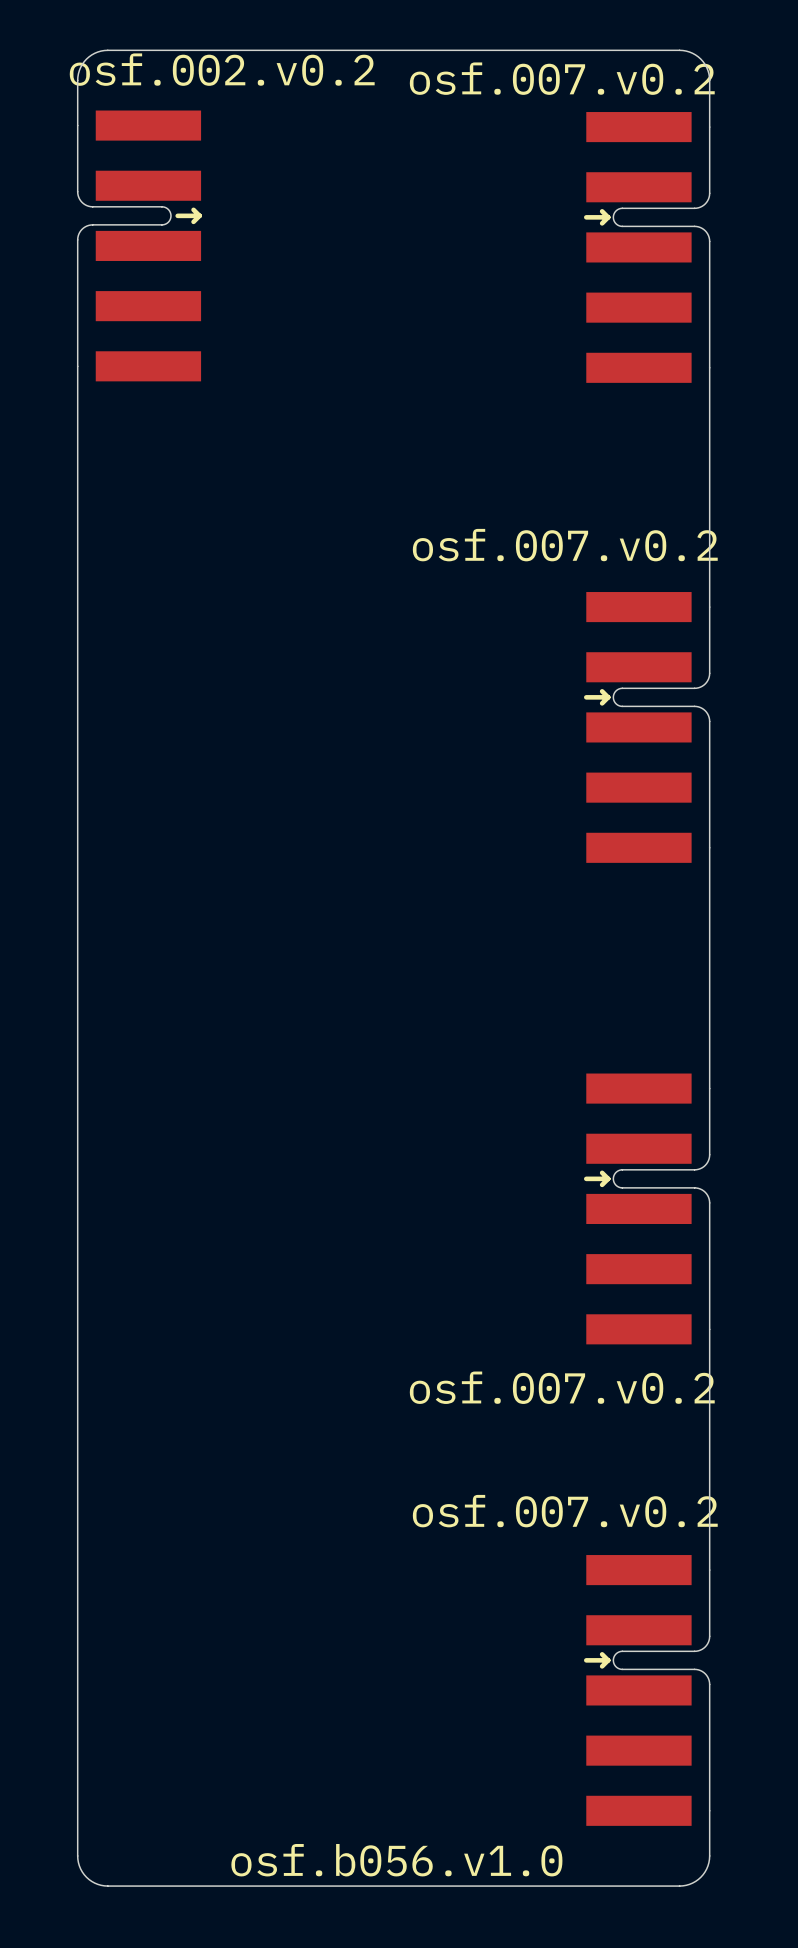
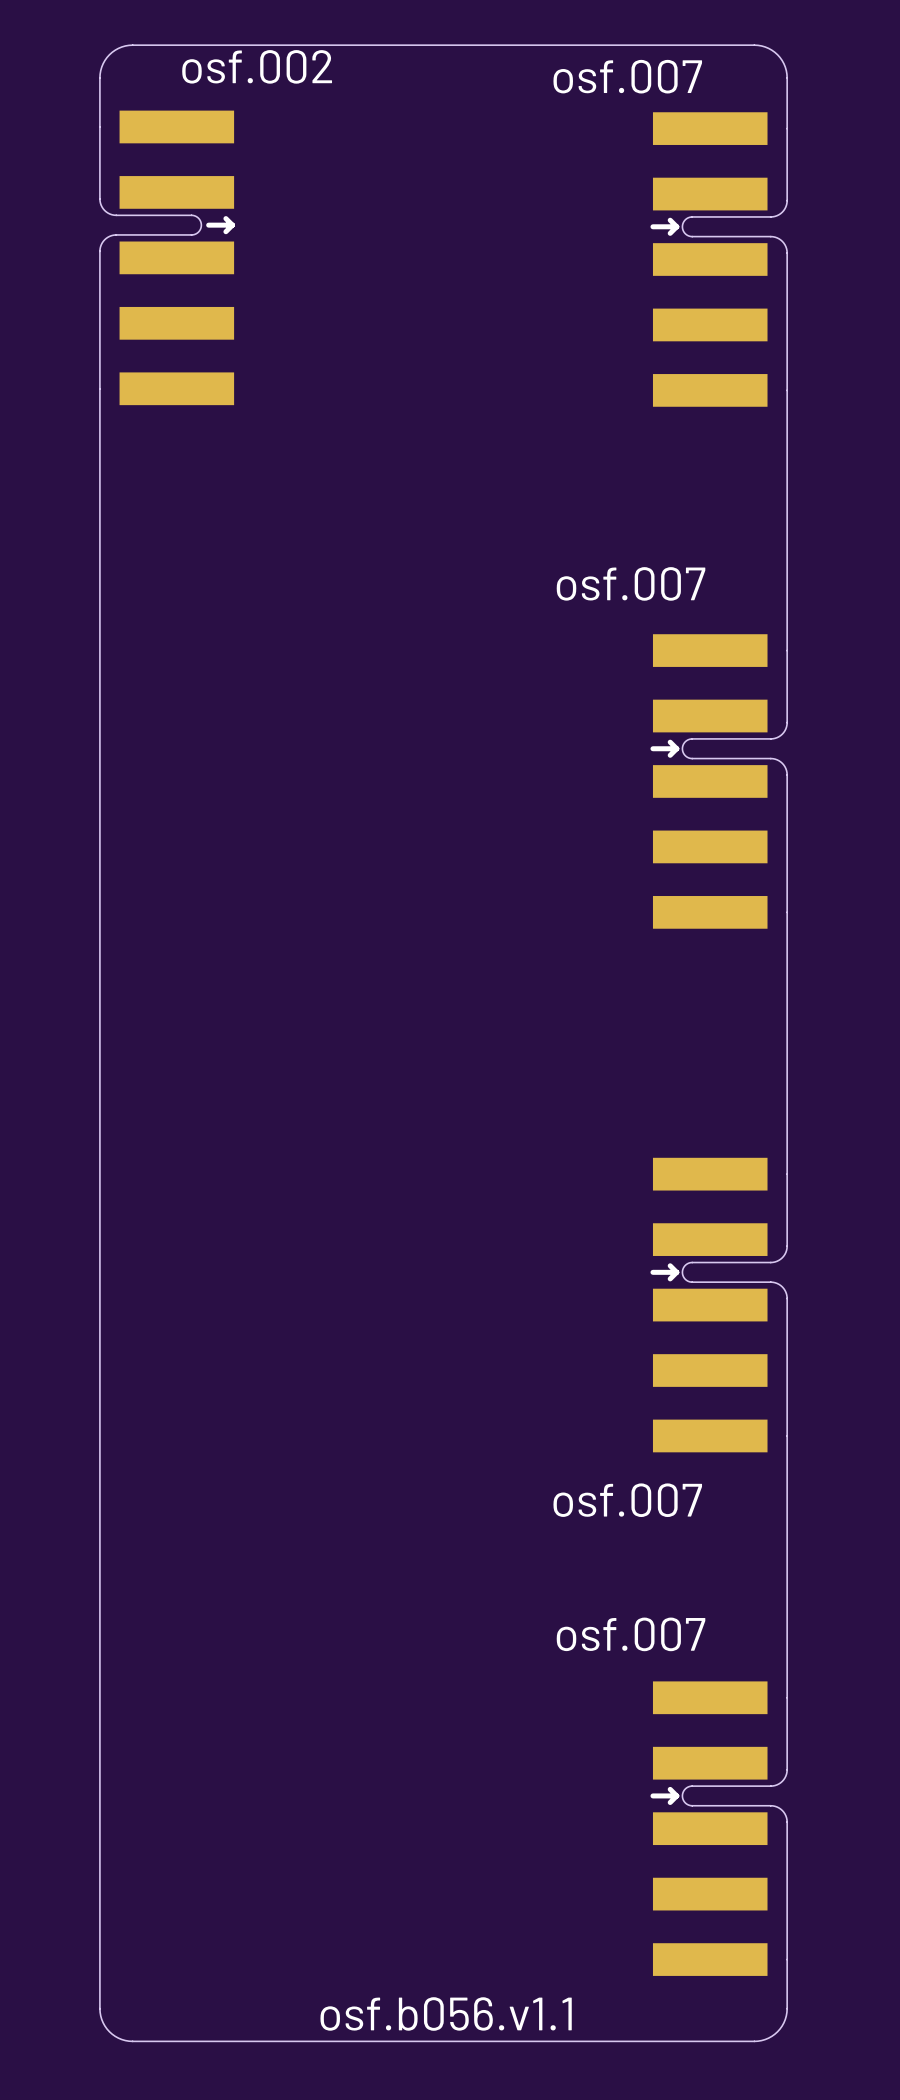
text: osf.002.v0.2 (222, 69) -> osf.002 (257, 66)
text: osf.007.v0.2 (562, 78) -> osf.007 (627, 76)
text: osf.007.v0.2 (565, 545) -> osf.007 (631, 583)
text: osf.007.v0.2 (562, 1387) -> osf.007 (627, 1500)
text: osf.007.v0.2 (565, 1511) -> osf.007 (631, 1634)
text: osf.b056.v1.0 (396, 1860) -> osf.b056.v1.1 (446, 2013)

